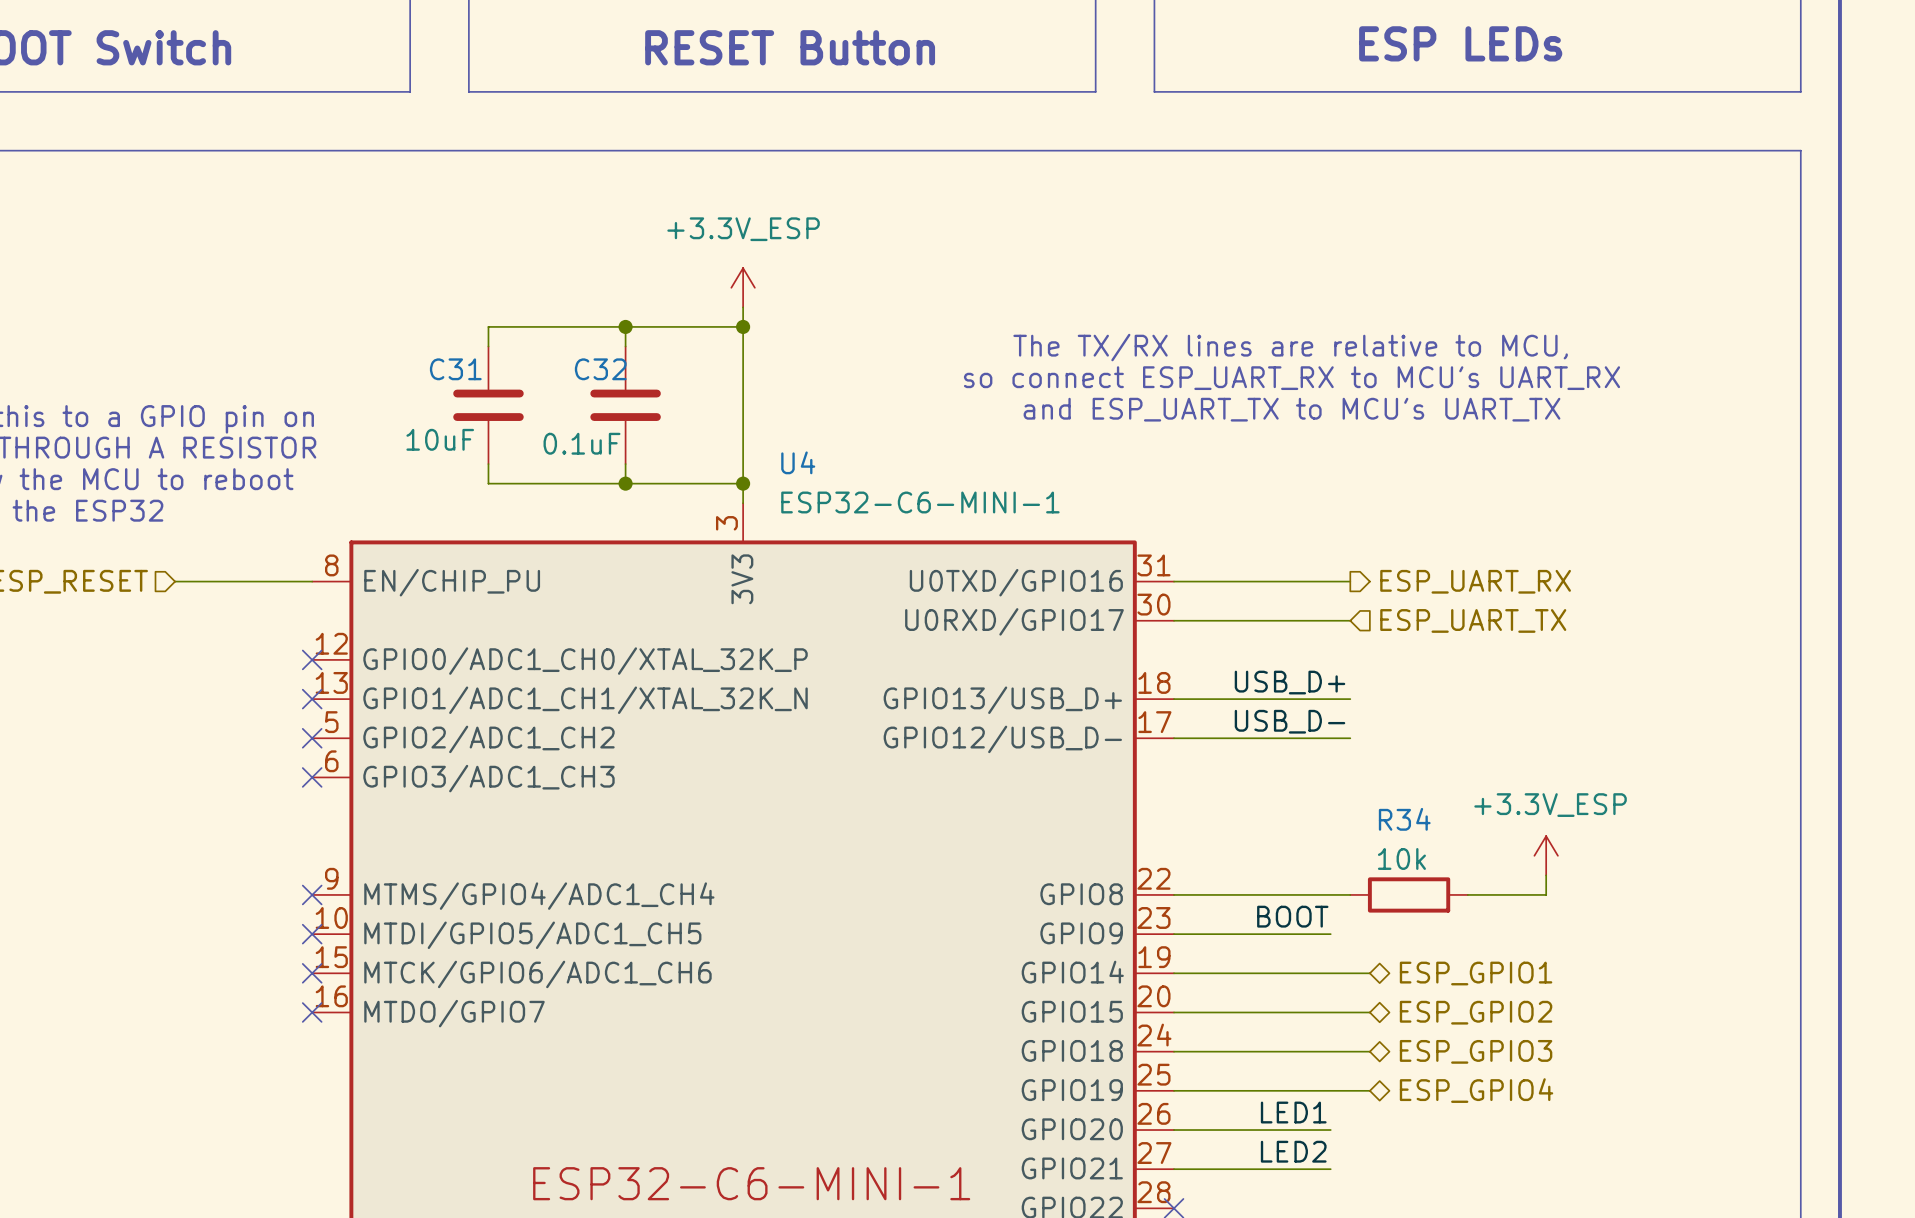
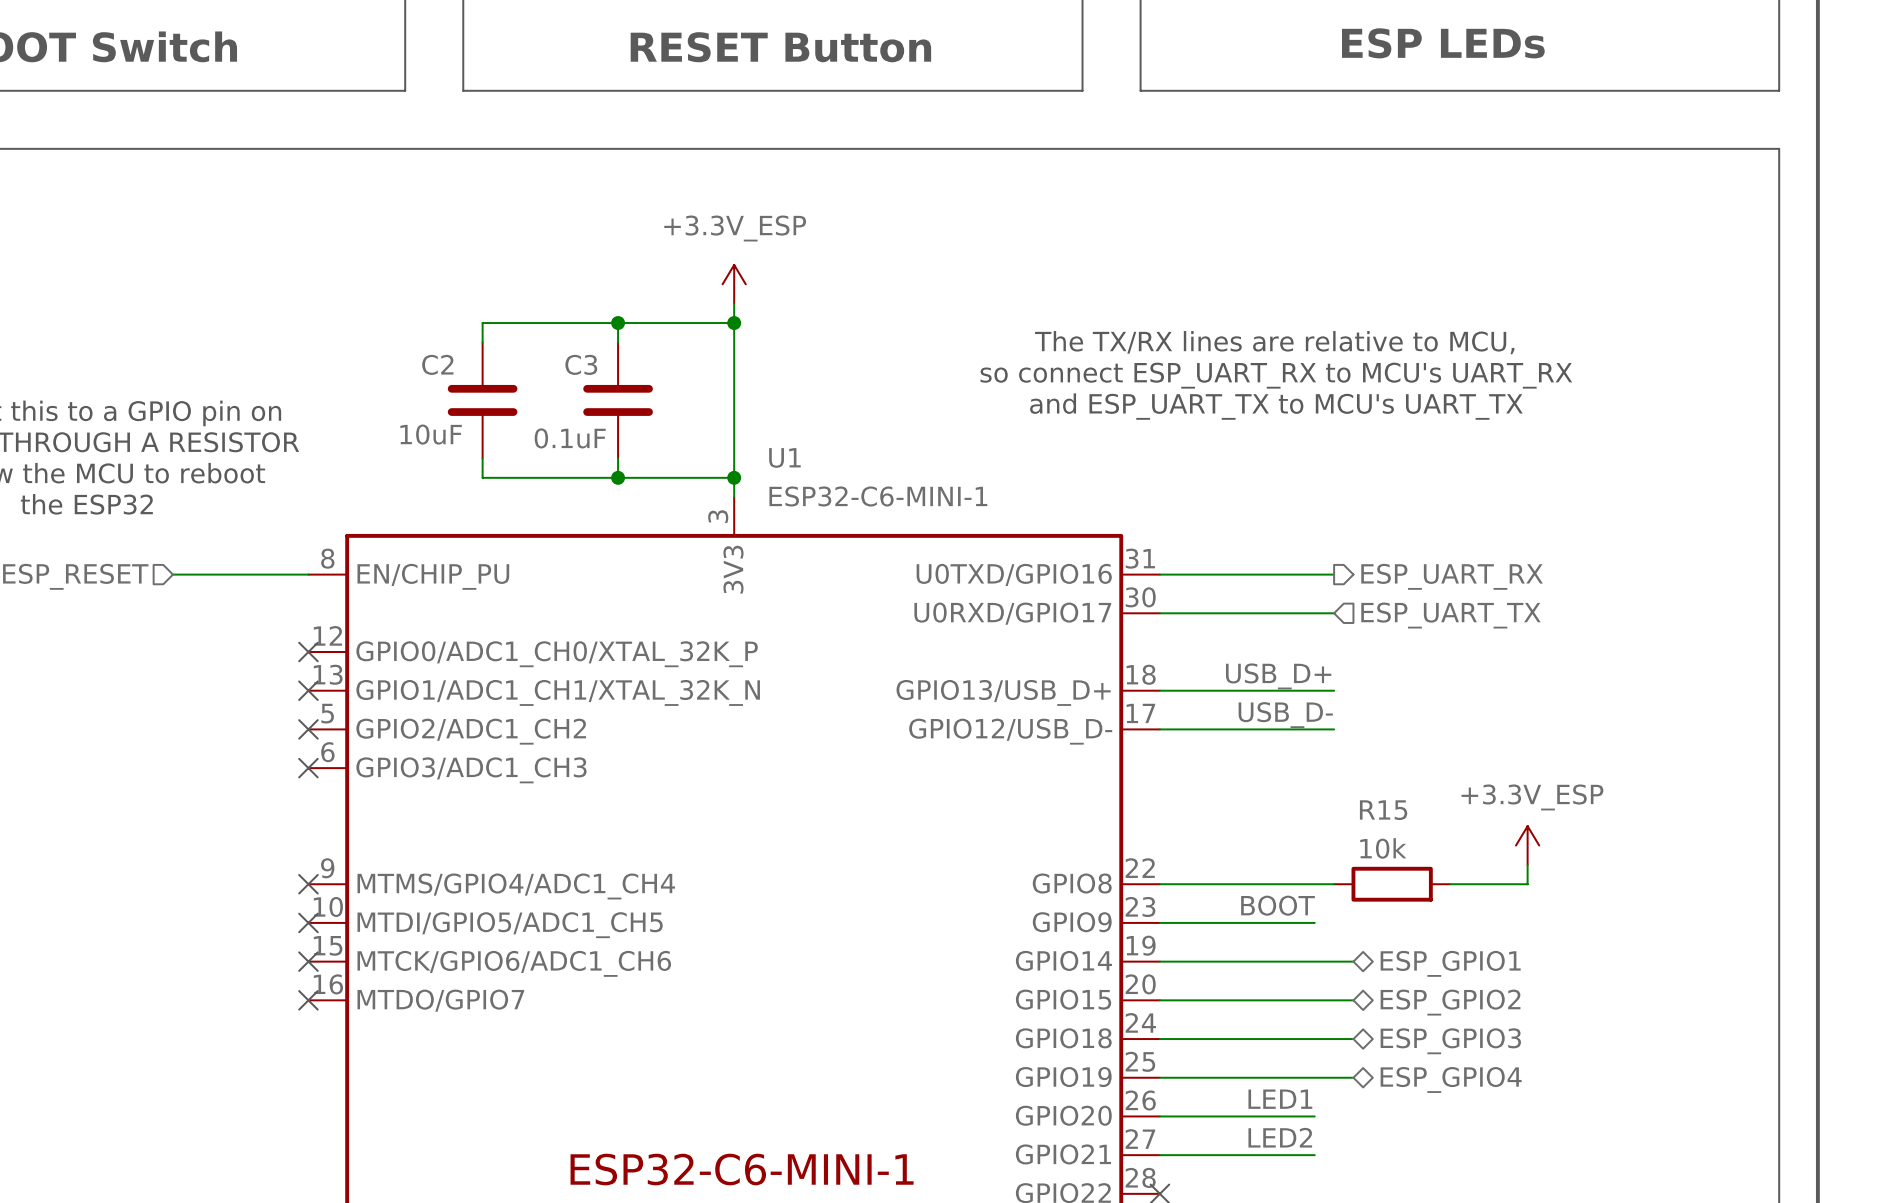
C31 name: C31 (455, 369) -> C2 (437, 364)
C32 name: C32 (600, 369) -> C3 (581, 364)
U4 name: U4 (798, 462) -> U1 (784, 457)
R34 name: R34 (1404, 819) -> R15 (1383, 810)

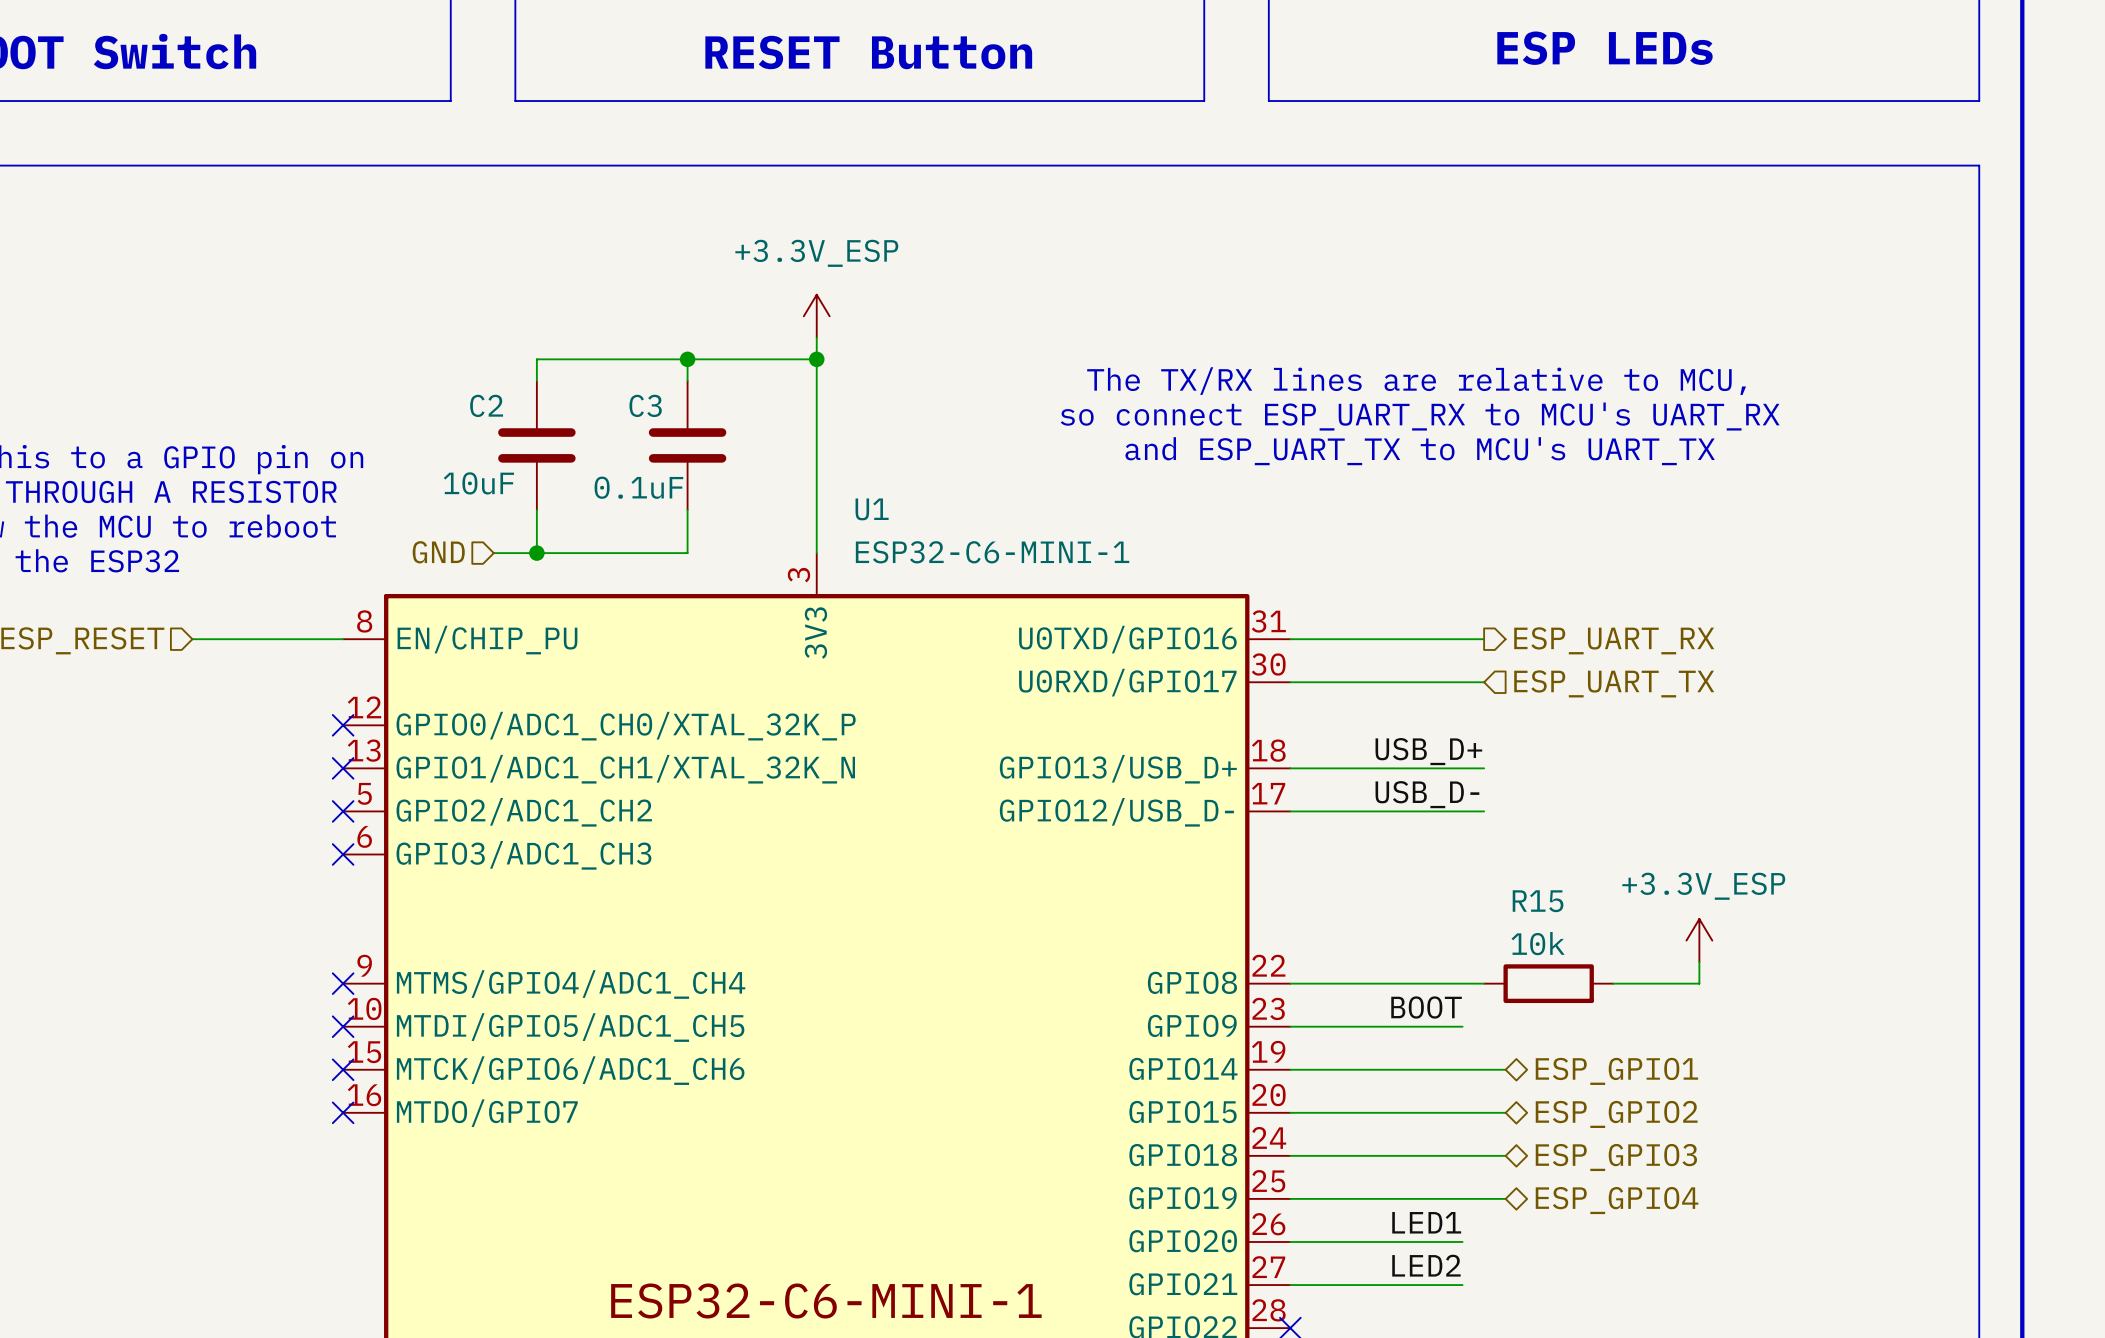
wire: (482, 477) (734, 477) -> (536, 531) (536, 553)
wire: none -> (687, 531) (687, 553) (493, 553)
junction: (618, 477) -> none
junction: (734, 477) -> none
hierarchical label: none -> GND (438, 552)
junction: none -> (536, 553)

